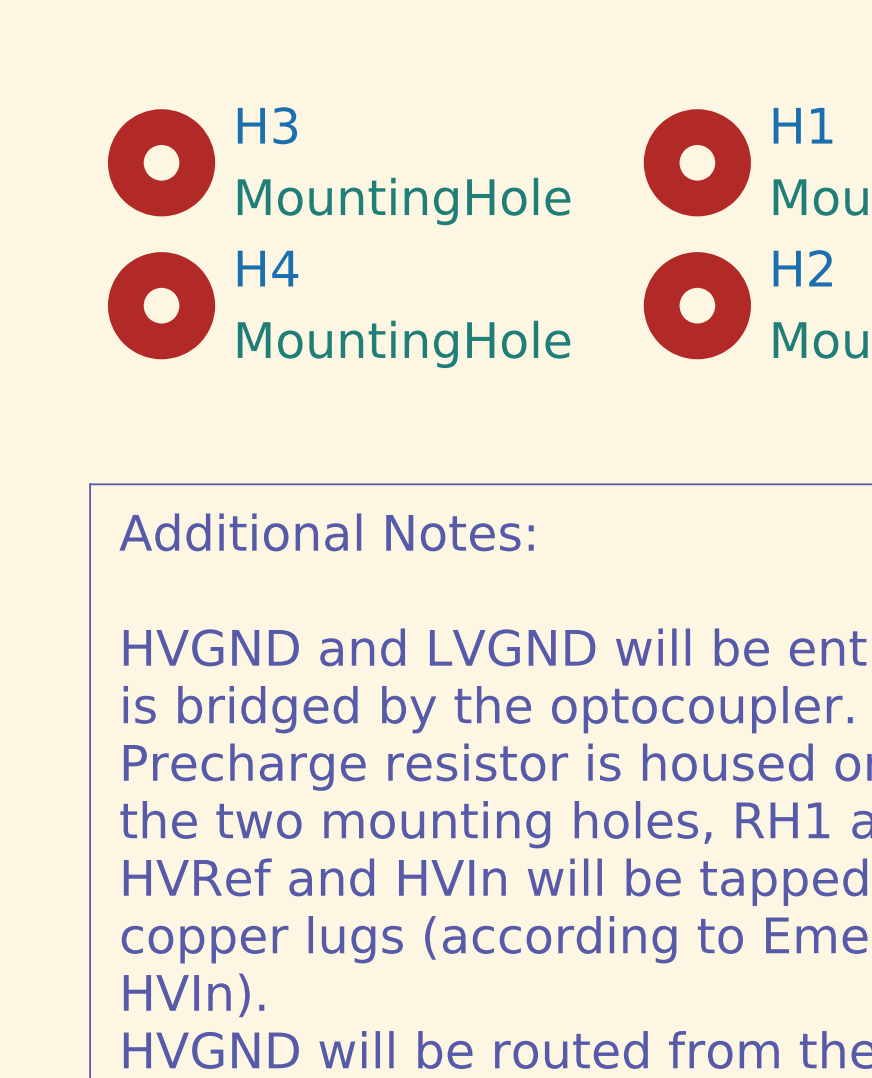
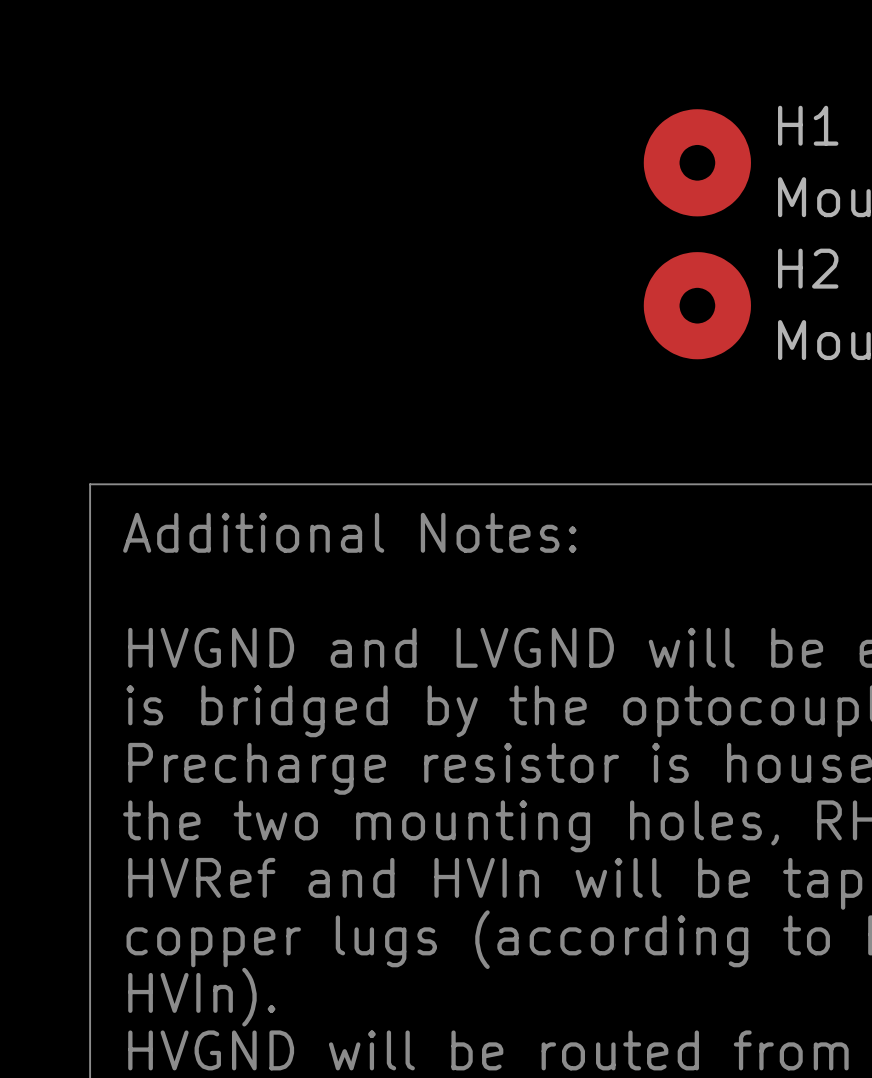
H3: MountingHole (161, 162) -> none
H4: MountingHole (161, 305) -> none

